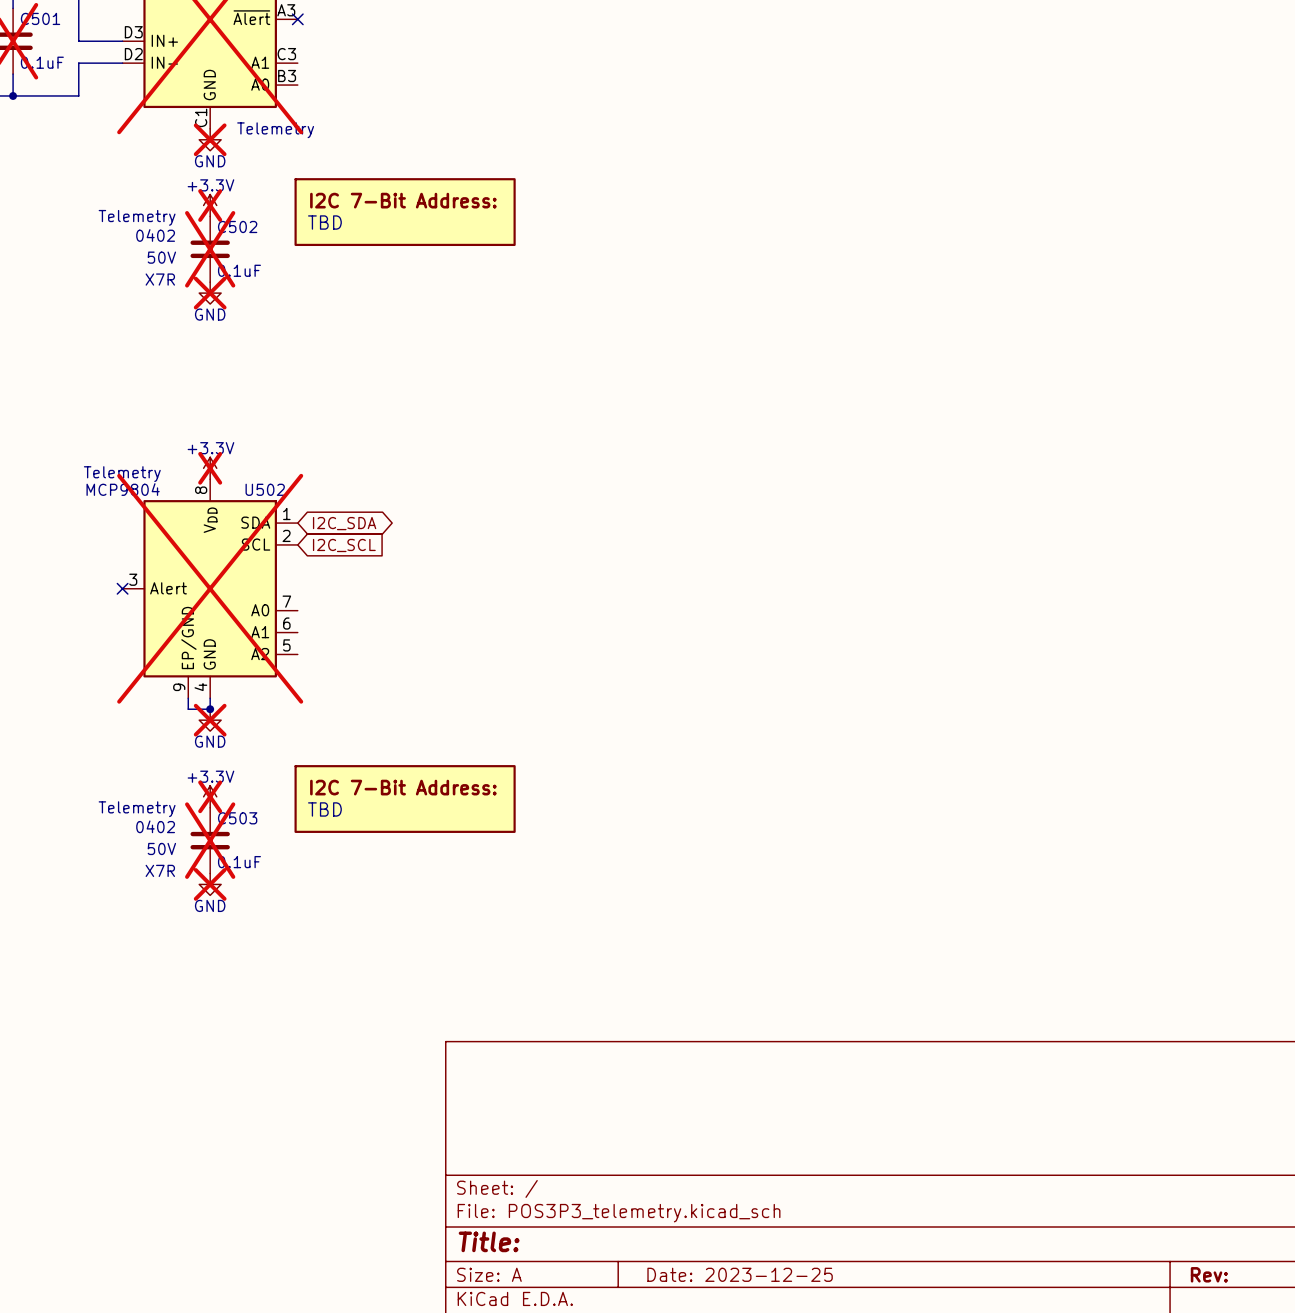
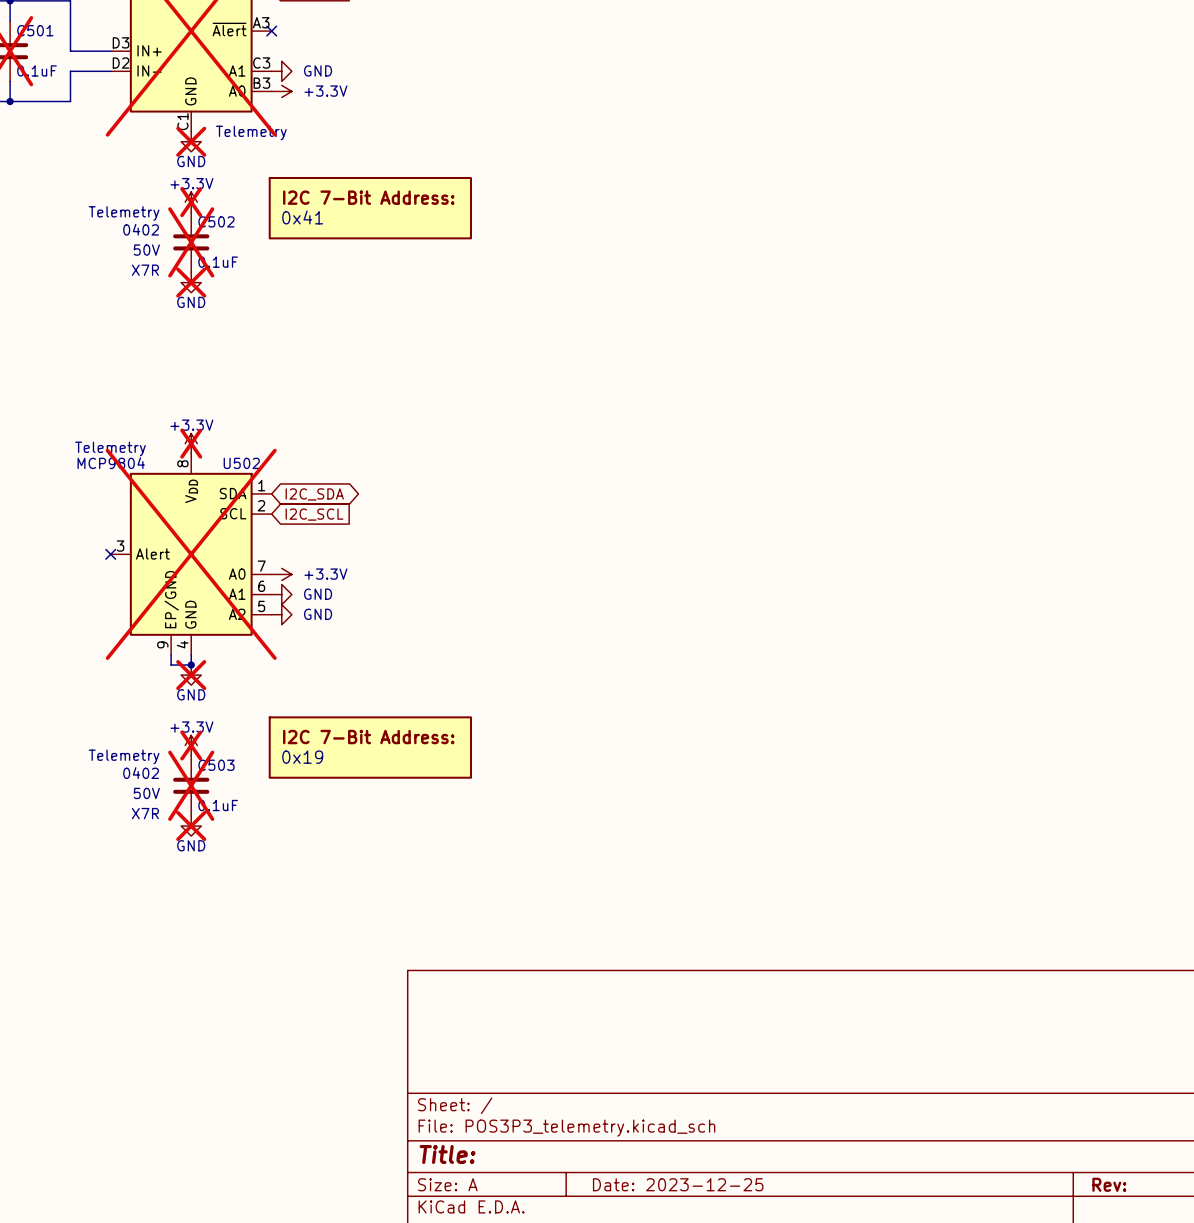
power symbol: none -> GND (281, 71)
power symbol: none -> +3.3V (281, 91)
part value: TBD (324, 222) -> 0x41 (302, 217)
power symbol: none -> +3.3V (281, 574)
power symbol: none -> GND (281, 594)
power symbol: none -> GND (281, 614)
part value: TBD (324, 809) -> 0x19 (302, 757)

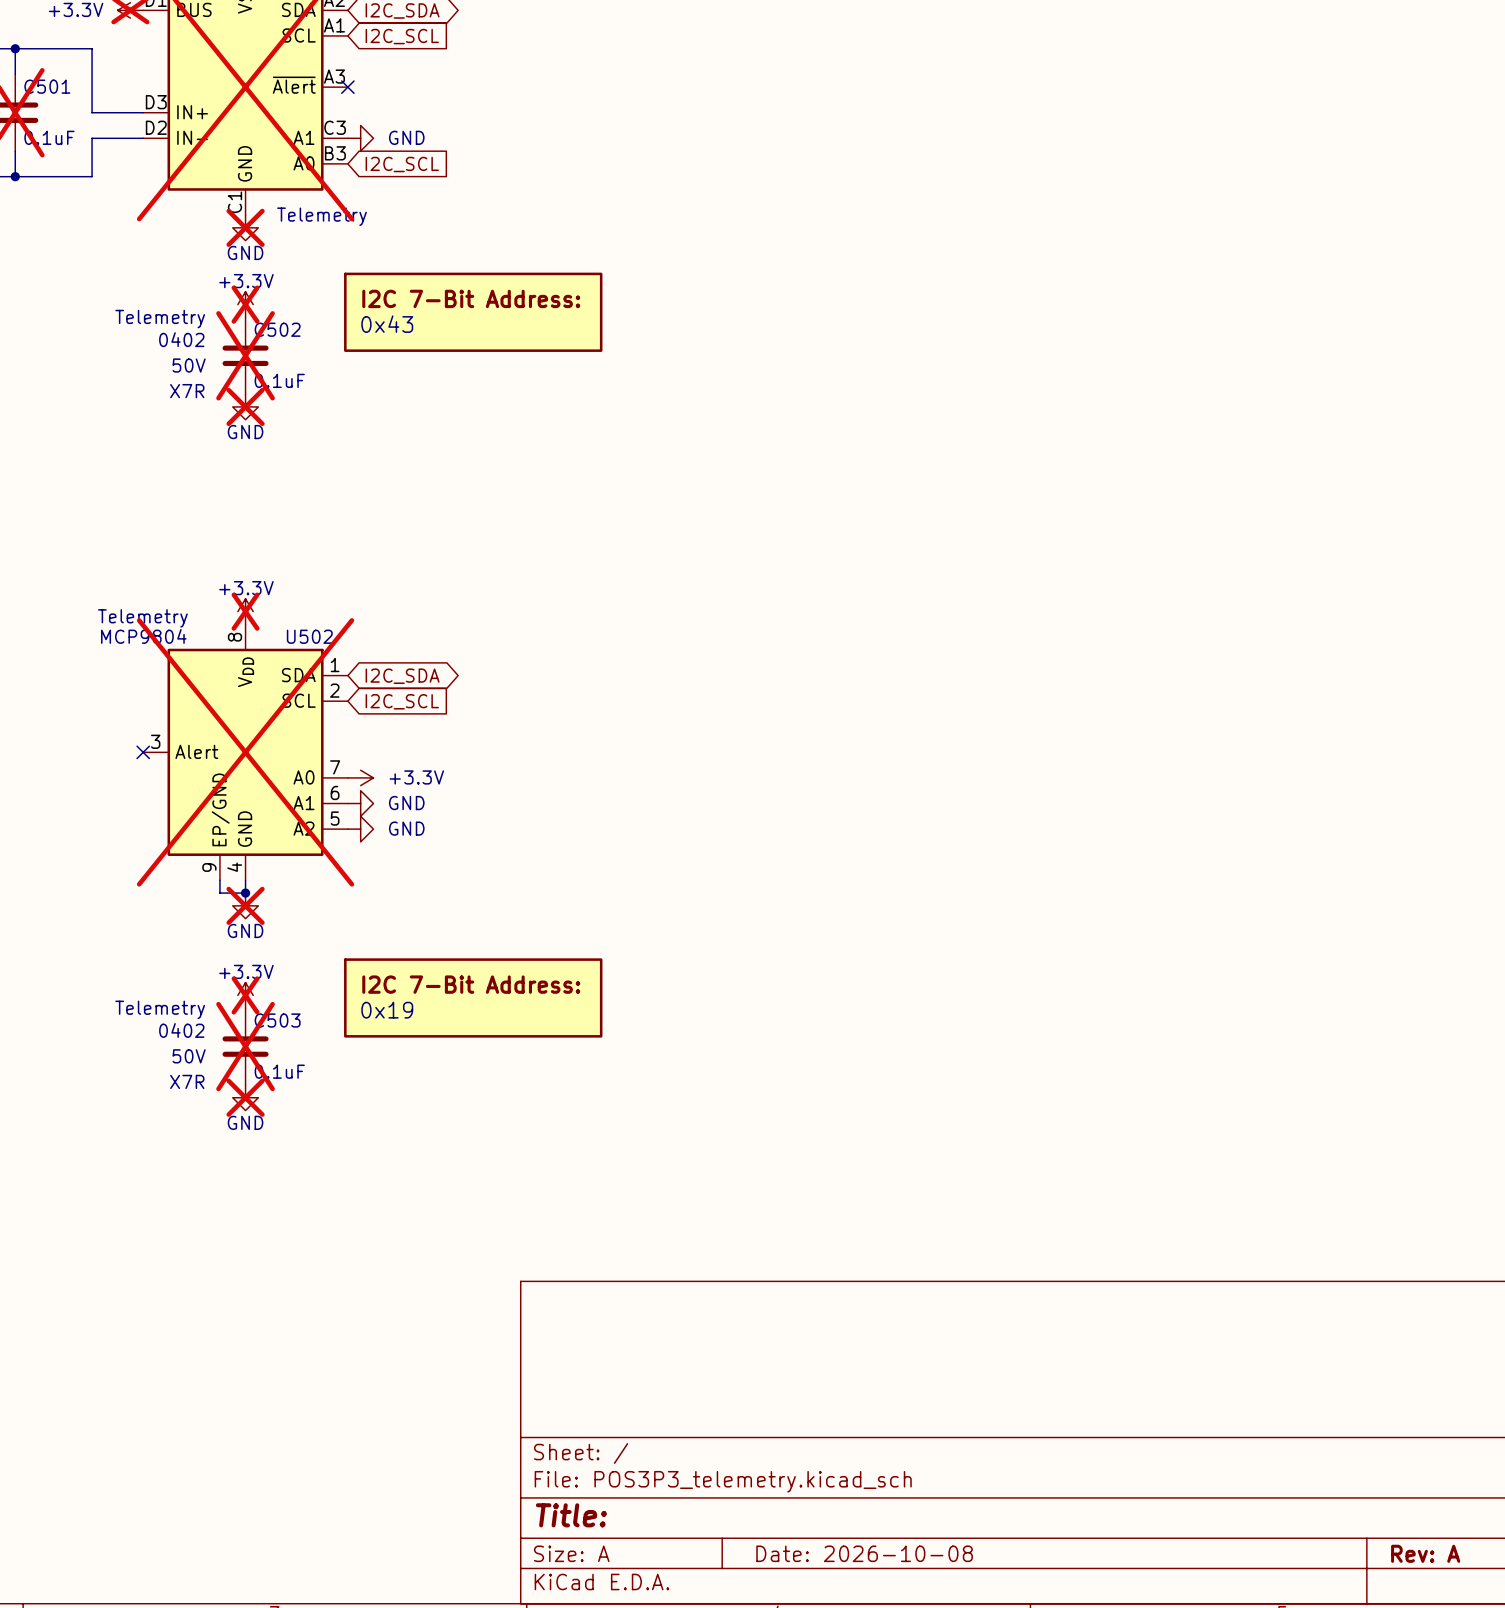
power symbol: +3.3V (281, 91) -> none
global label: none -> I2C_SCL (402, 164)
part value: 0x41 (302, 217) -> 0x43 (387, 324)
title block: Date: 2023-12-25 (678, 1184) -> Date: 2026-10-08 (864, 1553)
title block: Rev: (1109, 1184) -> Rev: A (1425, 1553)

